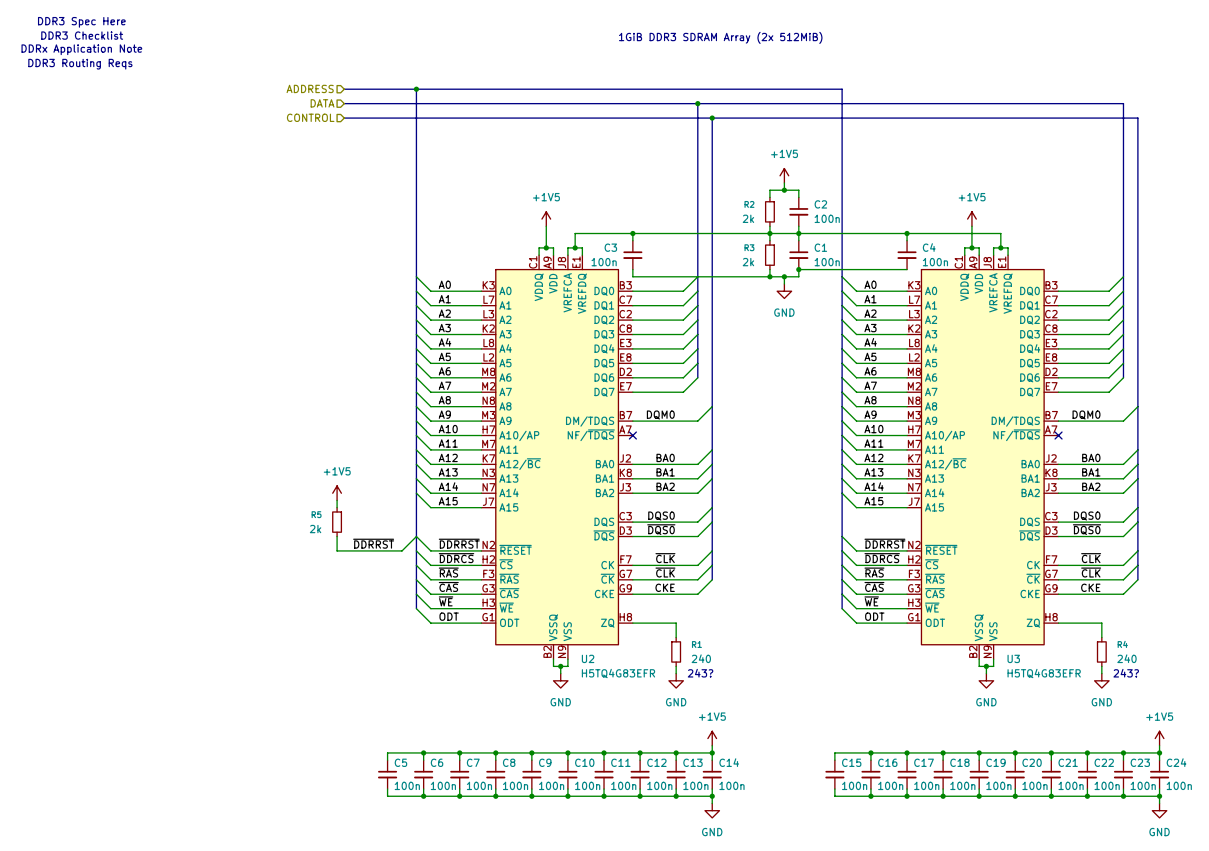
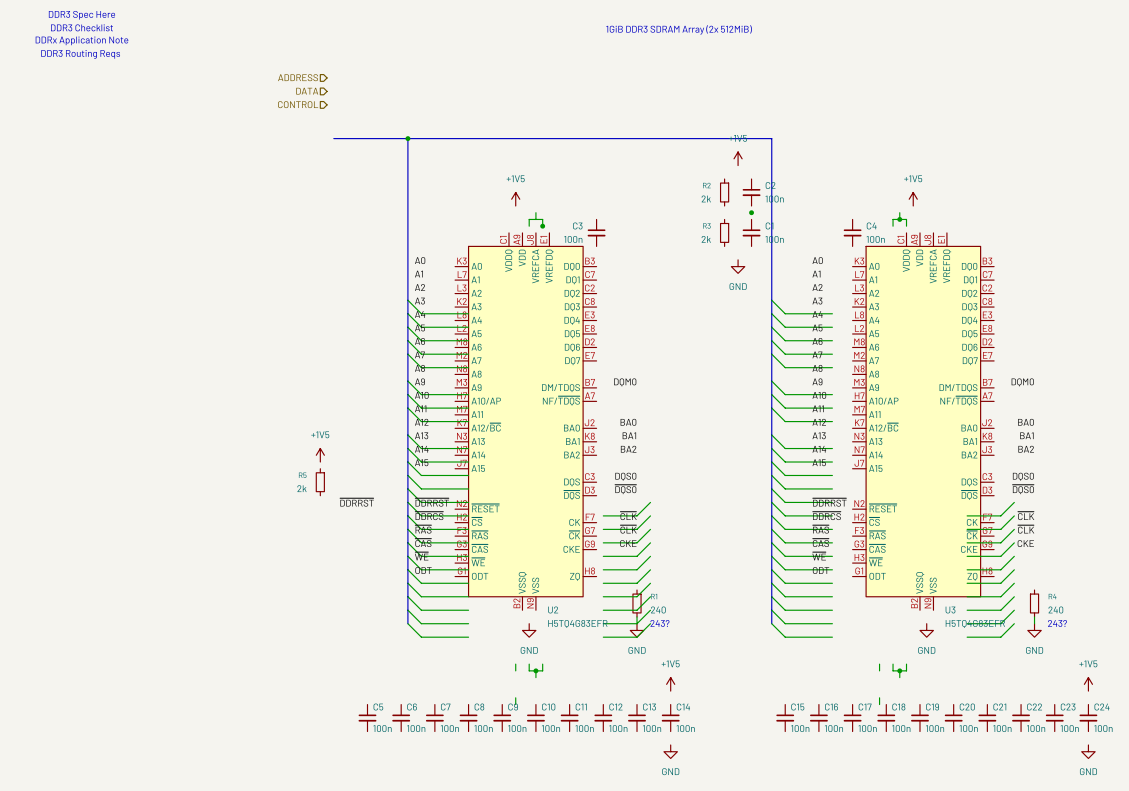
bus: (344, 89) (842, 89) (842, 608) -> none
bus: (416, 89) (416, 608) -> (407, 138) (407, 623)
junction: (416, 89) -> none
bus: (344, 103) (1123, 103) (1123, 377) -> none
bus: (697, 103) (697, 377) -> none
junction: (697, 103) -> none
bus: (344, 118) (1137, 118) (1137, 579) -> none
bus: (712, 118) (712, 579) -> none
junction: (712, 118) -> none
bus: none -> (333, 138) (771, 138) (771, 623)
junction: none -> (407, 138)
wire: (784, 183) (784, 190) -> none
junction: (784, 190) -> none
wire: (769, 197) (769, 190) (798, 190) (798, 197) -> none
wire: (546, 226) (546, 247) -> none
wire: (769, 226) (769, 240) -> none
wire: (798, 226) (798, 240) -> none
wire: (971, 226) (971, 247) -> none
wire: (632, 233) (632, 240) -> (535, 212) (535, 219)
junction: (632, 233) -> none
junction: (769, 233) -> none
wire: (907, 233) (907, 240) -> (899, 212) (899, 219)
junction: (907, 233) -> none
wire: (575, 240) (575, 233) (1000, 233) (1000, 247) -> (542, 219) (529, 219) (529, 226)
junction: (546, 247) -> none
junction position: (971, 247) -> (899, 219)
junction: (1000, 247) -> none
wire: (539, 255) (539, 247) (553, 247) (553, 255) -> none
wire: (567, 255) (567, 247) (582, 247) (582, 255) -> none
wire: (964, 255) (964, 247) (979, 247) (979, 255) -> (893, 226) (893, 219) (906, 219) (906, 226)
wire: (993, 255) (993, 247) (1008, 247) (1008, 255) -> none
wire: (632, 269) (632, 276) (798, 276) (798, 269) (907, 269) -> none
wire: (769, 269) (769, 276) -> none
junction: (798, 269) -> none
wire: (416, 276) (430, 291) (481, 291) -> (407, 300) (421, 313) (468, 313)
wire: (697, 276) (683, 291) (632, 291) -> none
junction: (769, 276) -> none
wire: (784, 276) (784, 284) -> none
junction: (784, 276) -> none
wire: (842, 276) (856, 291) (907, 291) -> (771, 300) (785, 313) (832, 313)
wire: (1123, 276) (1109, 291) (1058, 291) -> none
wire: (416, 291) (430, 305) (481, 305) -> (407, 313) (421, 327) (468, 327)
wire: (697, 291) (683, 305) (632, 305) -> none
wire: (842, 291) (856, 305) (907, 305) -> (771, 313) (785, 327) (832, 327)
wire: (1123, 291) (1109, 305) (1058, 305) -> none
wire: (416, 305) (430, 320) (481, 320) -> (407, 327) (421, 340) (468, 340)
wire: (697, 305) (683, 320) (632, 320) -> none
wire: (842, 305) (856, 320) (907, 320) -> (771, 327) (785, 340) (832, 340)
wire: (1123, 305) (1109, 320) (1058, 320) -> none
wire: (416, 320) (430, 334) (481, 334) -> (407, 340) (421, 354) (468, 354)
wire: (697, 320) (683, 334) (632, 334) -> none
wire: (842, 320) (856, 334) (907, 334) -> (771, 340) (785, 354) (832, 354)
wire: (1123, 320) (1109, 334) (1058, 334) -> none
wire: (416, 334) (430, 348) (481, 348) -> (407, 354) (421, 367) (468, 367)
wire: (697, 334) (683, 348) (632, 348) -> none
wire: (842, 334) (856, 348) (907, 348) -> (771, 354) (785, 367) (832, 367)
wire: (1123, 334) (1109, 348) (1058, 348) -> none
wire: (416, 348) (430, 363) (481, 363) -> none
wire: (697, 348) (683, 363) (632, 363) -> none
wire: (842, 348) (856, 363) (907, 363) -> none
wire: (1123, 348) (1109, 363) (1058, 363) -> none
wire: (416, 363) (430, 377) (481, 377) -> (407, 381) (421, 394) (468, 394)
wire: (697, 363) (683, 377) (632, 377) -> none
wire: (842, 363) (856, 377) (907, 377) -> (771, 381) (785, 394) (832, 394)
wire: (1123, 363) (1109, 377) (1058, 377) -> none
wire: (416, 377) (430, 392) (481, 392) -> (407, 394) (421, 408) (468, 408)
wire: (697, 377) (683, 392) (632, 392) -> none
wire: (842, 377) (856, 392) (907, 392) -> (771, 394) (785, 408) (832, 408)
wire: (1123, 377) (1109, 392) (1058, 392) -> none
wire: (416, 392) (430, 406) (481, 406) -> (407, 408) (421, 421) (468, 421)
wire: (842, 392) (856, 406) (907, 406) -> (771, 408) (785, 421) (832, 421)
wire: (416, 406) (430, 421) (481, 421) -> none
wire: (712, 406) (697, 421) (632, 421) -> none
wire: (842, 406) (856, 421) (907, 421) -> none
wire: (1137, 406) (1123, 421) (1058, 421) -> none
wire: (416, 421) (430, 435) (481, 435) -> (407, 435) (421, 448) (468, 448)
wire: (842, 421) (856, 435) (907, 435) -> (771, 435) (785, 448) (832, 448)
wire: (416, 435) (430, 449) (481, 449) -> (407, 448) (421, 462) (468, 462)
no-connect mark: (632, 435) -> none
wire: (842, 435) (856, 449) (907, 449) -> (771, 448) (785, 462) (832, 462)
no-connect mark: (1058, 435) -> none
wire: (416, 449) (430, 464) (481, 464) -> (407, 462) (421, 475) (468, 475)
wire: (712, 449) (697, 464) (632, 464) -> none
wire: (842, 449) (856, 464) (907, 464) -> (771, 462) (785, 475) (832, 475)
wire: (1137, 449) (1123, 464) (1058, 464) -> none
wire: (416, 464) (430, 478) (481, 478) -> (407, 475) (421, 488) (468, 488)
wire: (712, 464) (697, 478) (632, 478) -> none
wire: (842, 464) (856, 478) (907, 478) -> (771, 475) (785, 488) (832, 488)
wire: (1137, 464) (1123, 478) (1058, 478) -> none
wire: (416, 478) (430, 493) (481, 493) -> (407, 488) (421, 502) (468, 502)
wire: (712, 478) (697, 493) (632, 493) -> none
wire: (842, 478) (856, 493) (907, 493) -> (771, 488) (785, 502) (832, 502)
wire: (1137, 478) (1123, 493) (1058, 493) -> none
wire: (416, 493) (430, 507) (481, 507) -> (407, 502) (421, 515) (468, 515)
wire: (842, 493) (856, 507) (907, 507) -> (771, 502) (785, 515) (832, 515)
wire: (337, 500) (337, 507) -> none
wire: (712, 507) (697, 522) (632, 522) -> none
wire: (1137, 507) (1123, 522) (1058, 522) -> none
wire: (712, 522) (697, 536) (632, 536) -> none
wire: (1137, 522) (1123, 536) (1058, 536) -> none
wire: (337, 536) (337, 550) (402, 550) (416, 536) (430, 550) (481, 550) -> none
wire: (842, 536) (856, 550) (907, 550) -> (771, 542) (785, 556) (832, 556)
wire: none -> (650, 502) (637, 515) (603, 515)
wire: none -> (1014, 502) (1000, 515) (967, 515)
wire: (416, 550) (430, 565) (481, 565) -> (407, 556) (421, 569) (468, 569)
wire: (712, 550) (697, 565) (632, 565) -> none
wire: (842, 550) (856, 565) (907, 565) -> (771, 556) (785, 569) (832, 569)
wire: (1137, 550) (1123, 565) (1058, 565) -> none
wire: none -> (407, 515) (421, 529) (468, 529)
wire: none -> (650, 515) (637, 529) (603, 529)
wire: none -> (771, 515) (785, 529) (832, 529)
wire: none -> (1014, 515) (1000, 529) (967, 529)
wire: (416, 565) (430, 579) (481, 579) -> (407, 569) (421, 583) (468, 583)
wire: (712, 565) (697, 579) (632, 579) -> none
wire: (842, 565) (856, 579) (907, 579) -> (771, 569) (785, 583) (832, 583)
wire: (1137, 565) (1123, 579) (1058, 579) -> none
wire: none -> (407, 529) (421, 542) (468, 542)
wire: none -> (650, 529) (637, 542) (603, 542)
wire: none -> (771, 529) (785, 542) (832, 542)
wire: none -> (1014, 529) (1000, 542) (967, 542)
wire: (416, 579) (430, 594) (481, 594) -> (407, 583) (421, 596) (468, 596)
wire: (712, 579) (697, 594) (632, 594) -> none
wire: (842, 579) (856, 594) (907, 594) -> (771, 583) (785, 596) (832, 596)
wire: (1137, 579) (1123, 594) (1058, 594) -> none
wire: none -> (407, 542) (421, 556) (468, 556)
wire: none -> (650, 542) (637, 556) (603, 556)
wire: none -> (1014, 542) (1000, 556) (967, 556)
wire: (416, 594) (430, 608) (481, 608) -> (407, 596) (421, 610) (468, 610)
wire: (842, 594) (856, 608) (907, 608) -> (771, 596) (785, 610) (832, 610)
wire: none -> (650, 556) (637, 569) (603, 569)
wire: none -> (1014, 556) (1000, 569) (967, 569)
wire: (416, 608) (430, 623) (481, 623) -> (407, 610) (421, 623) (468, 623)
wire: (842, 608) (856, 623) (907, 623) -> (771, 610) (785, 623) (832, 623)
wire: none -> (650, 569) (637, 583) (603, 583)
wire: none -> (1014, 569) (1000, 583) (967, 583)
wire: (632, 623) (676, 623) (676, 637) -> none
wire: (1058, 623) (1101, 623) (1101, 637) -> none
wire: none -> (650, 583) (637, 596) (603, 596)
wire: none -> (1014, 583) (1000, 596) (967, 596)
wire: none -> (650, 596) (637, 610) (603, 610)
wire: none -> (1014, 596) (1000, 610) (967, 610)
wire: (553, 659) (553, 666) (567, 666) (567, 659) -> (529, 664) (529, 670) (542, 670) (542, 664)
wire: none -> (650, 610) (637, 623) (603, 623)
wire: (979, 659) (979, 666) (993, 666) (993, 659) -> (893, 664) (893, 670) (906, 670) (906, 664)
wire: none -> (1014, 610) (1000, 623) (967, 623)
wire: (560, 666) (560, 673) -> (535, 670) (535, 677)
junction: (560, 666) -> none
wire: (986, 666) (986, 673) -> none
junction: (986, 666) -> none
wire: none -> (407, 623) (421, 637) (468, 637)
wire: none -> (650, 623) (637, 637) (603, 637)
wire: none -> (771, 623) (785, 637) (832, 637)
wire: none -> (1014, 623) (1000, 637) (967, 637)
junction: none -> (535, 670)
junction: none -> (899, 670)
wire: (712, 745) (712, 760) -> none
wire: (1159, 745) (1159, 760) -> none
wire: (423, 752) (423, 760) -> none
junction: (423, 752) -> none
wire: (459, 752) (459, 760) -> none
junction: (459, 752) -> none
wire: (495, 752) (495, 760) -> none
junction: (495, 752) -> none
wire: (531, 752) (531, 760) -> none
junction: (531, 752) -> none
wire: (567, 752) (567, 760) -> (515, 664) (515, 670)
junction: (567, 752) -> none
wire: (604, 752) (604, 760) -> none
junction: (604, 752) -> none
wire: (640, 752) (640, 760) -> none
junction: (640, 752) -> none
wire: (676, 752) (676, 760) -> none
junction: (676, 752) -> none
wire: (712, 752) (387, 752) (387, 760) -> none
junction: (712, 752) -> none
wire: (870, 752) (870, 760) -> none
junction: (870, 752) -> none
wire: (907, 752) (907, 760) -> none
junction: (907, 752) -> none
wire: (943, 752) (943, 760) -> (879, 664) (879, 670)
junction: (943, 752) -> none
wire: (979, 752) (979, 760) -> none
junction: (979, 752) -> none
wire: (1015, 752) (1015, 760) -> none
junction: (1015, 752) -> none
wire: (1051, 752) (1051, 760) -> none
junction: (1051, 752) -> none
wire: (1087, 752) (1087, 760) -> none
junction: (1087, 752) -> none
wire: (1123, 752) (1123, 760) -> none
junction: (1123, 752) -> none
wire: (1159, 752) (834, 752) (834, 760) -> none
junction: (1159, 752) -> none
wire: (387, 789) (387, 796) (712, 796) -> none
wire: (423, 789) (423, 796) -> none
wire: (459, 789) (459, 796) -> none
wire: (495, 789) (495, 796) -> none
wire: (531, 789) (531, 796) -> none
wire: (567, 789) (567, 796) -> (515, 697) (515, 704)
wire: (604, 789) (604, 796) -> none
wire: (640, 789) (640, 796) -> none
wire: (676, 789) (676, 796) -> none
wire: (712, 789) (712, 803) -> none
wire: (834, 789) (834, 796) (1159, 796) -> none
wire: (870, 789) (870, 796) -> none
wire: (907, 789) (907, 796) -> none
wire: (943, 789) (943, 796) -> (879, 697) (879, 704)
wire: (979, 789) (979, 796) -> (899, 670) (899, 677)
wire: (1015, 789) (1015, 796) -> none
wire: (1051, 789) (1051, 796) -> none
wire: (1087, 789) (1087, 796) -> none
wire: (1123, 789) (1123, 796) -> none
wire: (1159, 789) (1159, 803) -> none
junction: (423, 796) -> none
junction: (459, 796) -> none
junction: (495, 796) -> none
junction: (531, 796) -> none
junction: (567, 796) -> none
junction: (604, 796) -> none
junction: (640, 796) -> none
junction: (676, 796) -> none
junction: (712, 796) -> none
junction: (870, 796) -> none
junction: (907, 796) -> none
junction: (943, 796) -> none
junction: (979, 796) -> none
junction: (1015, 796) -> none
junction: (1051, 796) -> none
junction: (1087, 796) -> none
junction: (1123, 796) -> none
junction: (1159, 796) -> none

